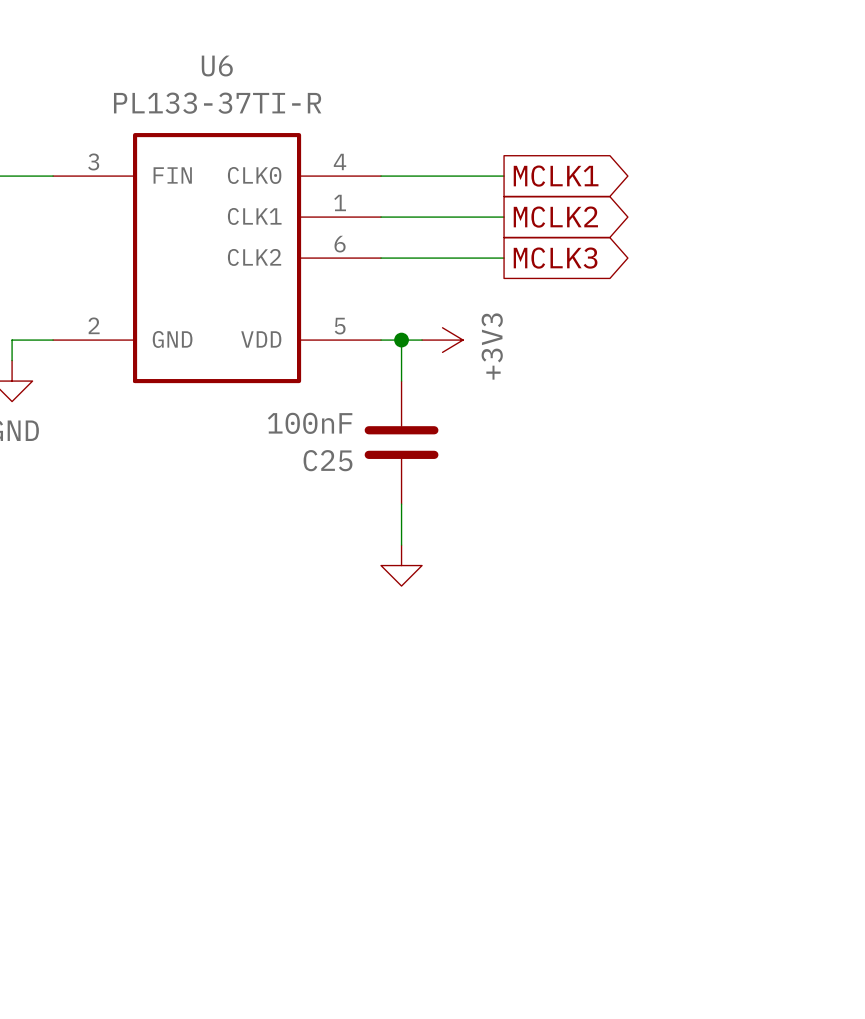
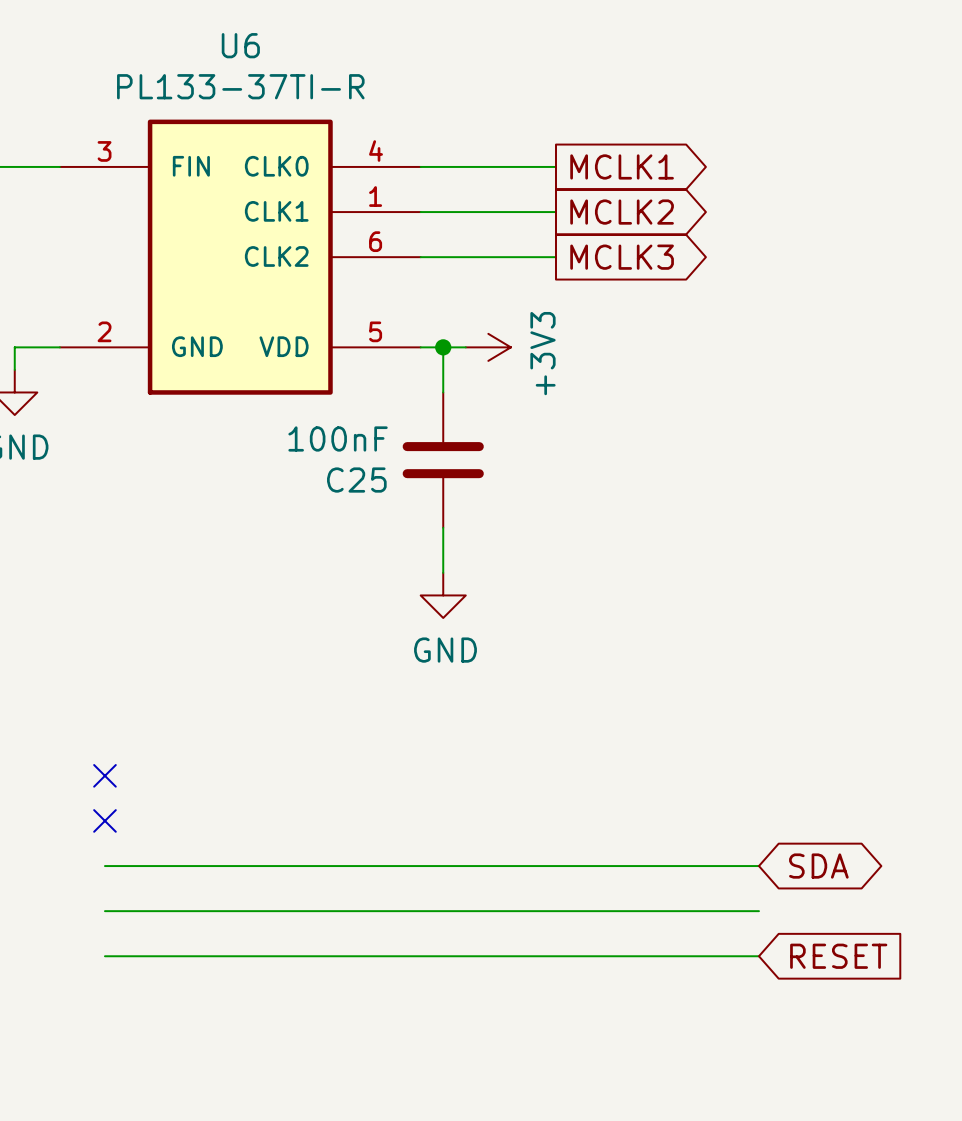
power symbol text: none -> GND (445, 650)
no-connect mark: none -> (104, 775)
no-connect mark: none -> (104, 820)
wire: none -> (104, 866) (758, 866)
global label: none -> SDA (818, 866)
wire: none -> (104, 911) (758, 911)
wire: none -> (104, 956) (758, 956)
global label: none -> RESET (838, 956)

